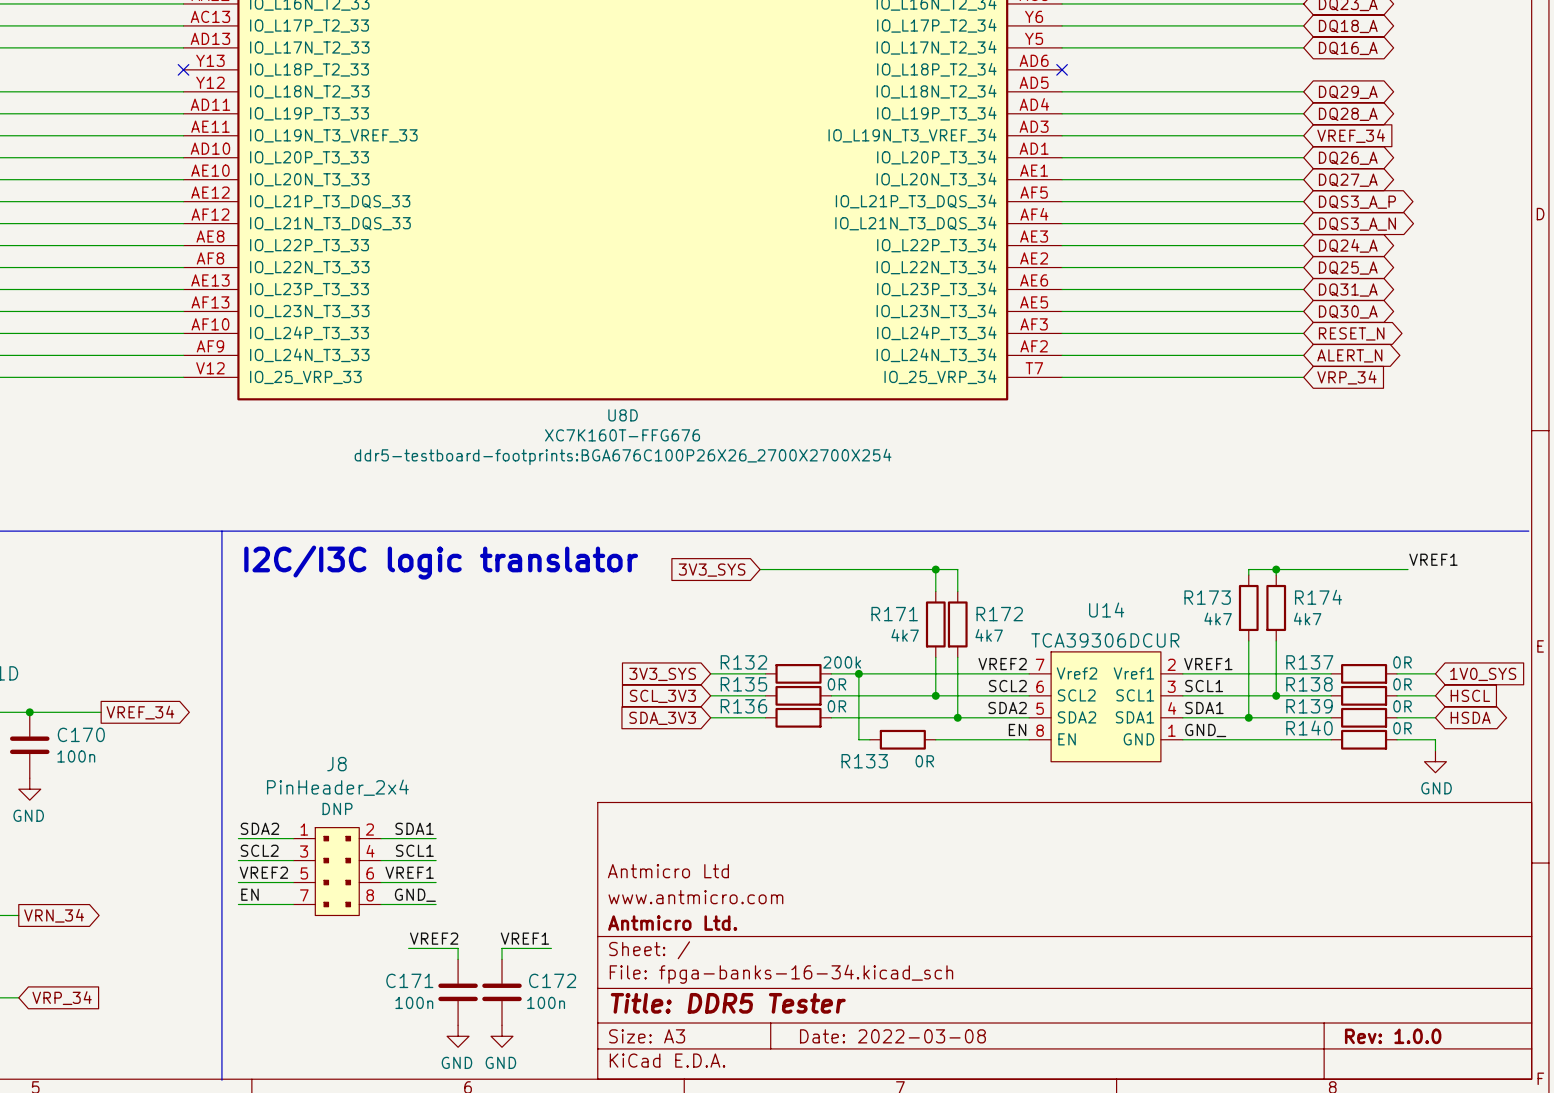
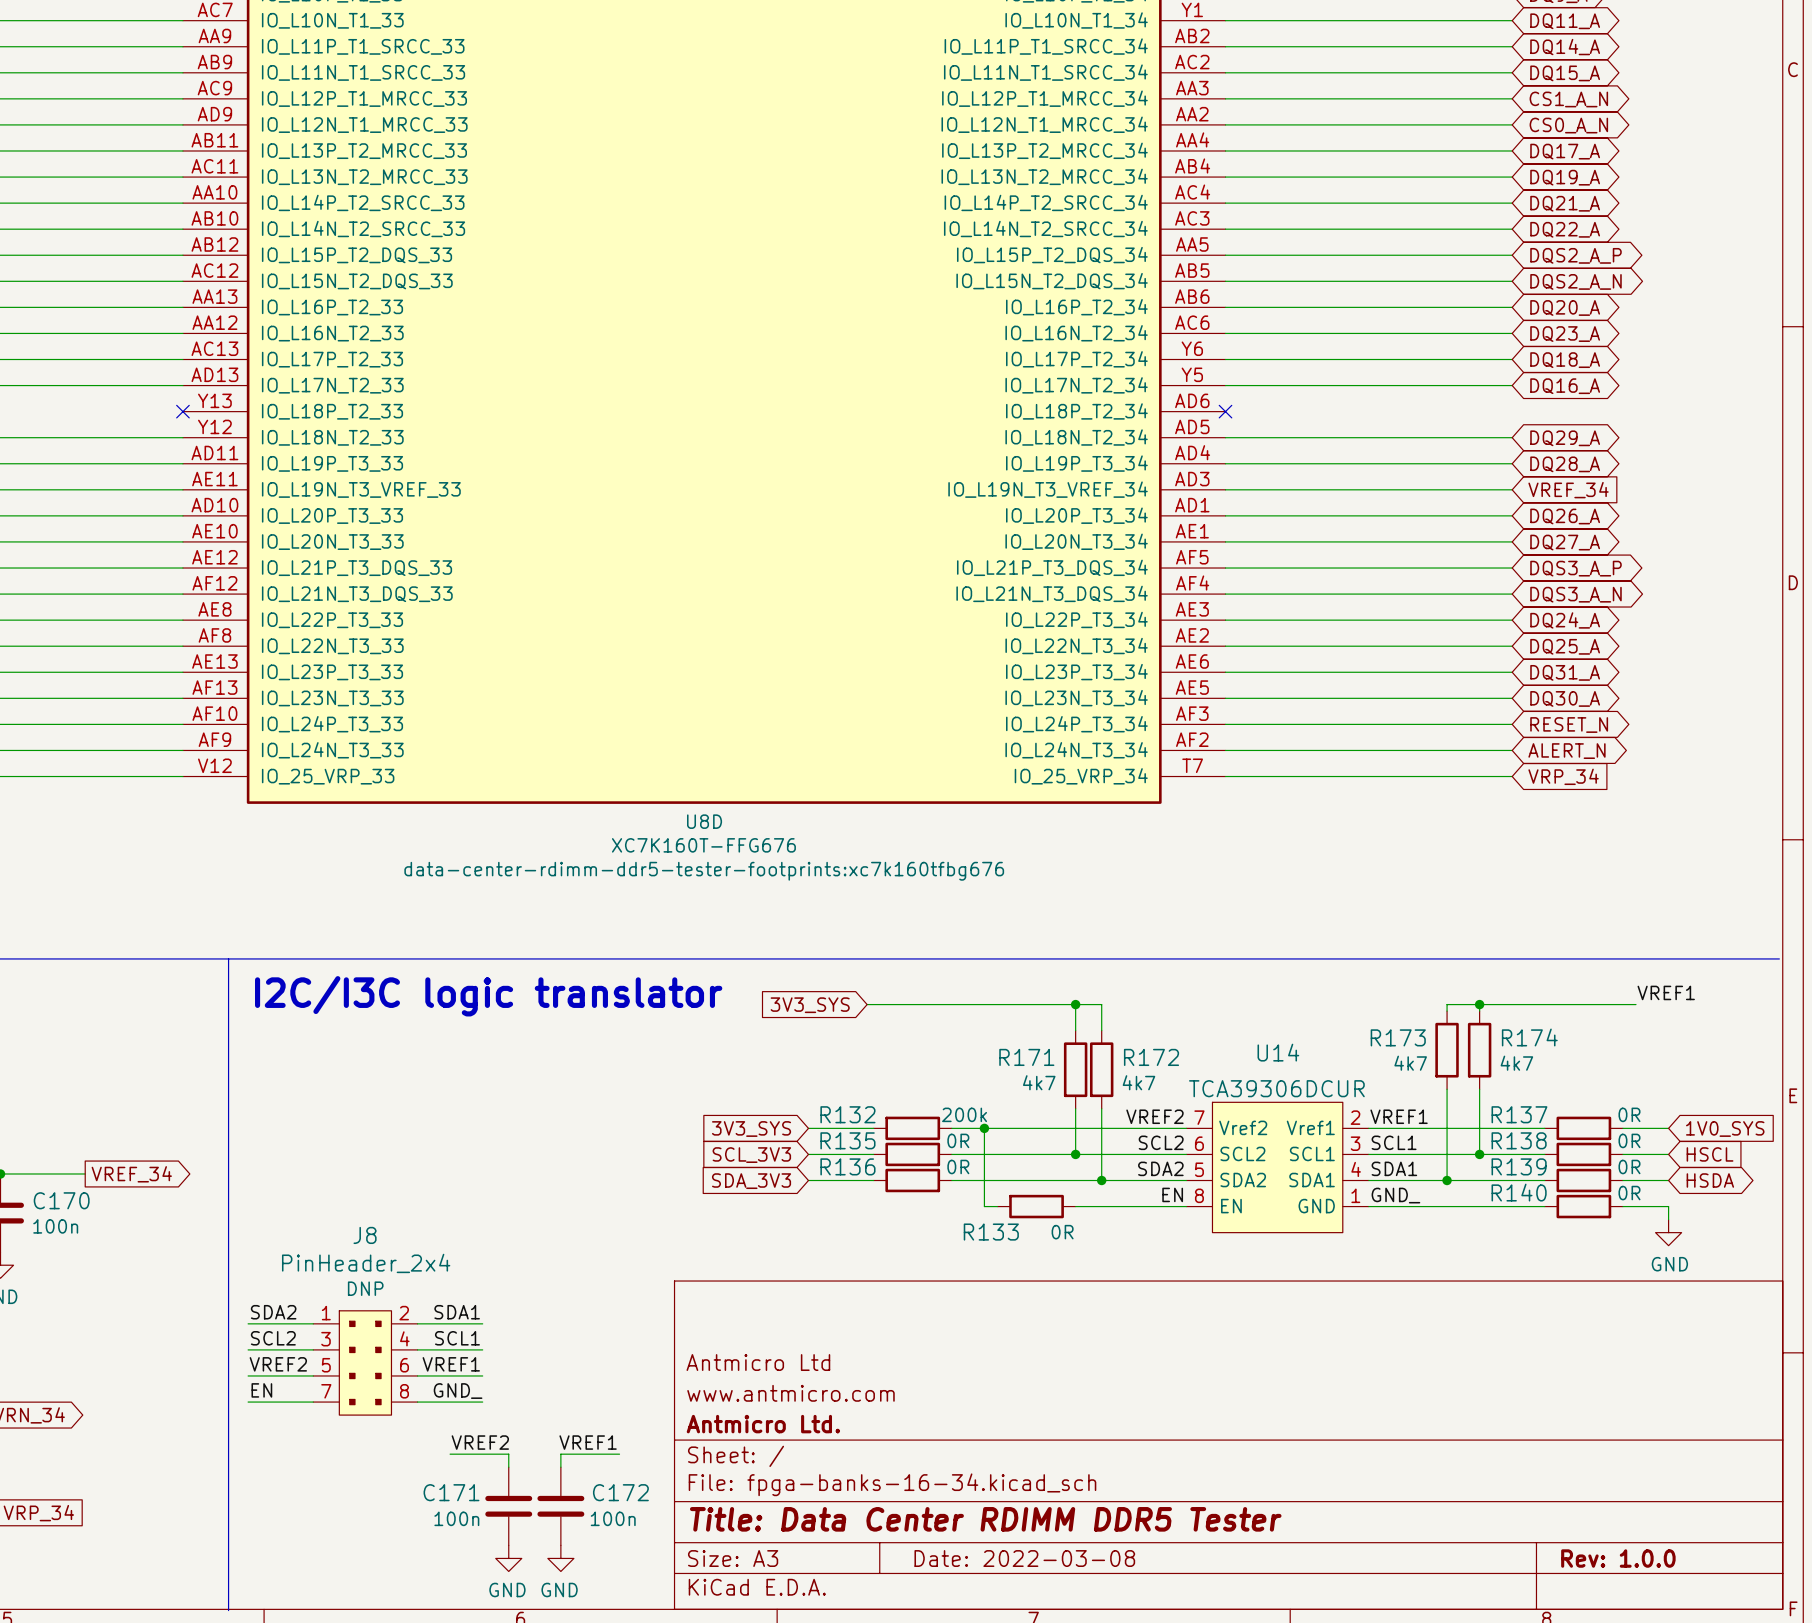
U8D text: ddr5-testboard-footprints:BGA676C100P26X26_2700X2700X254 (623, 456) -> data-center-rdimm-ddr5-tester-footprints:xc7k160tfbg676 (704, 871)
title block: Title: DDR5 Tester (728, 1003) -> Title: Data Center RDIMM DDR5 Tester (985, 1519)

